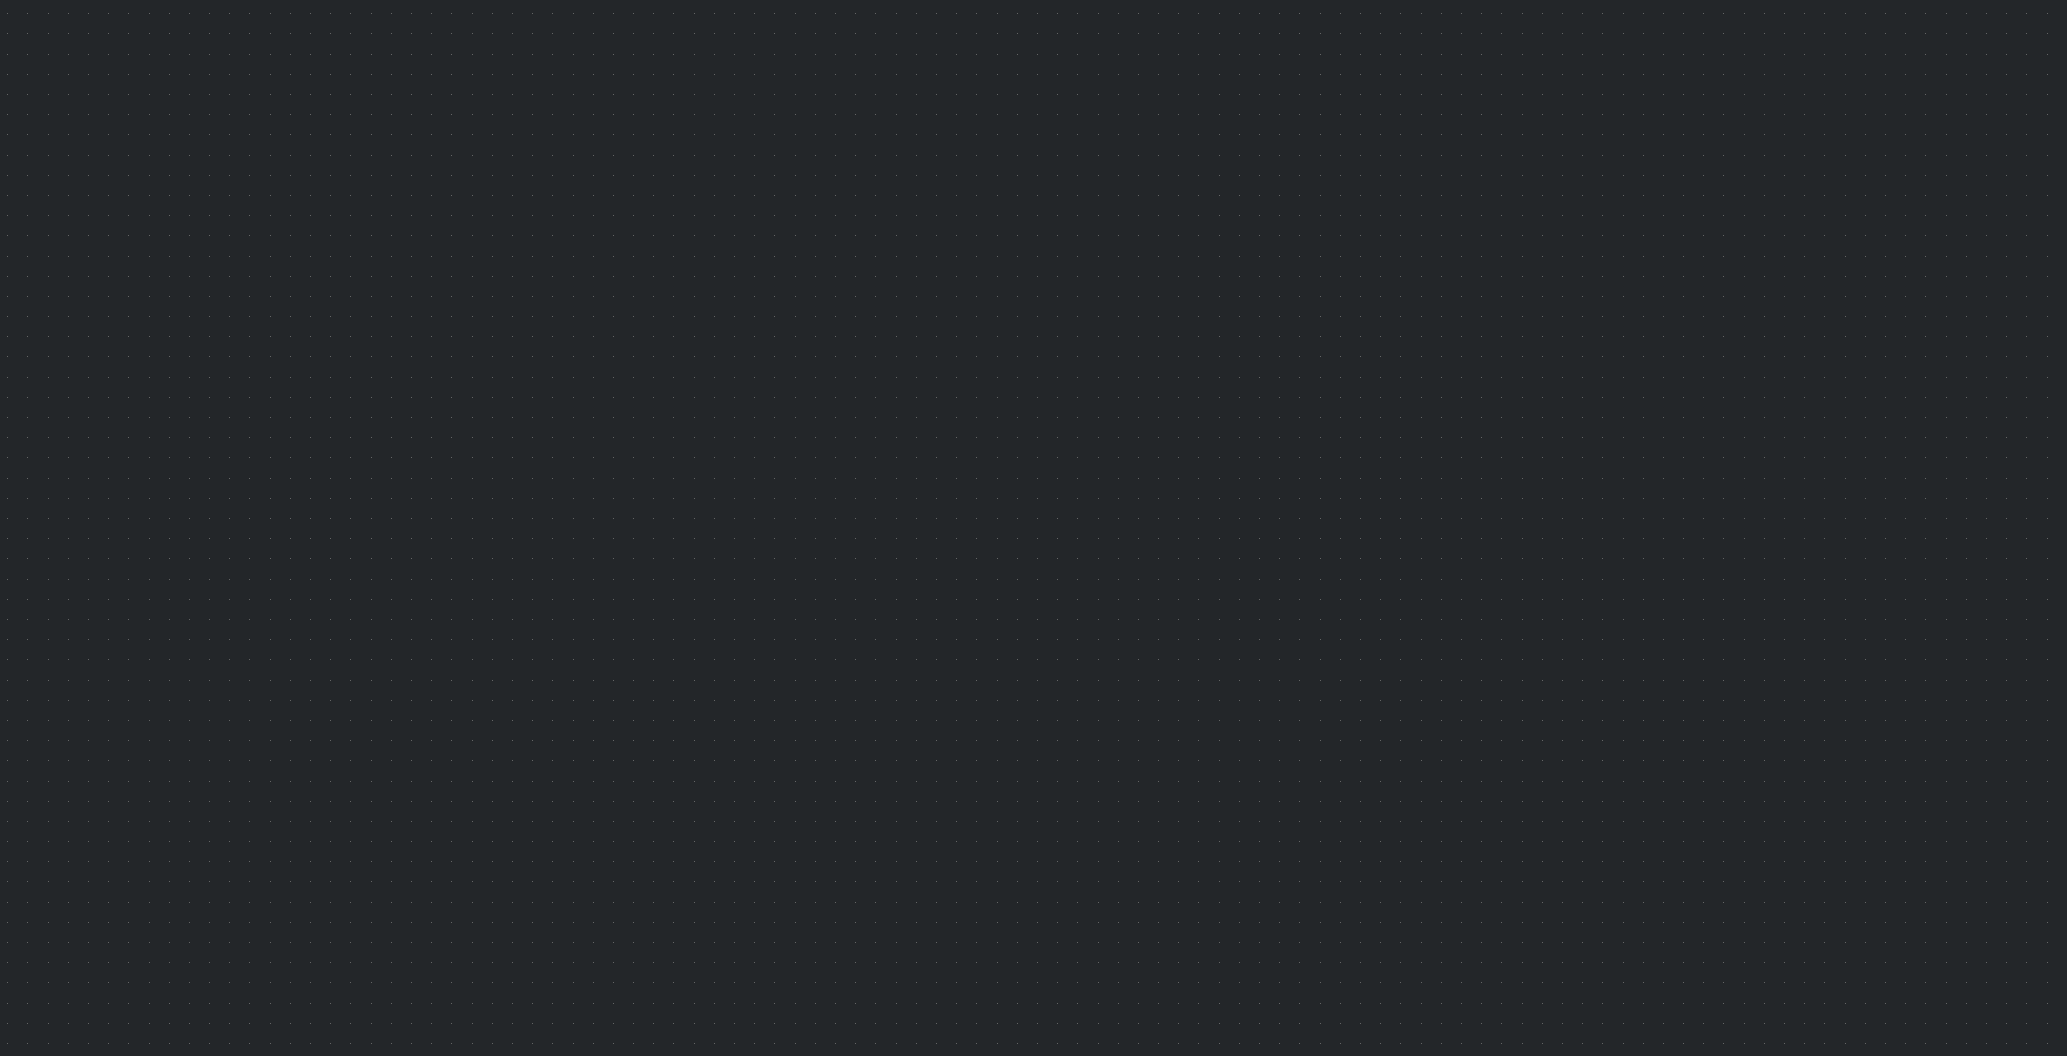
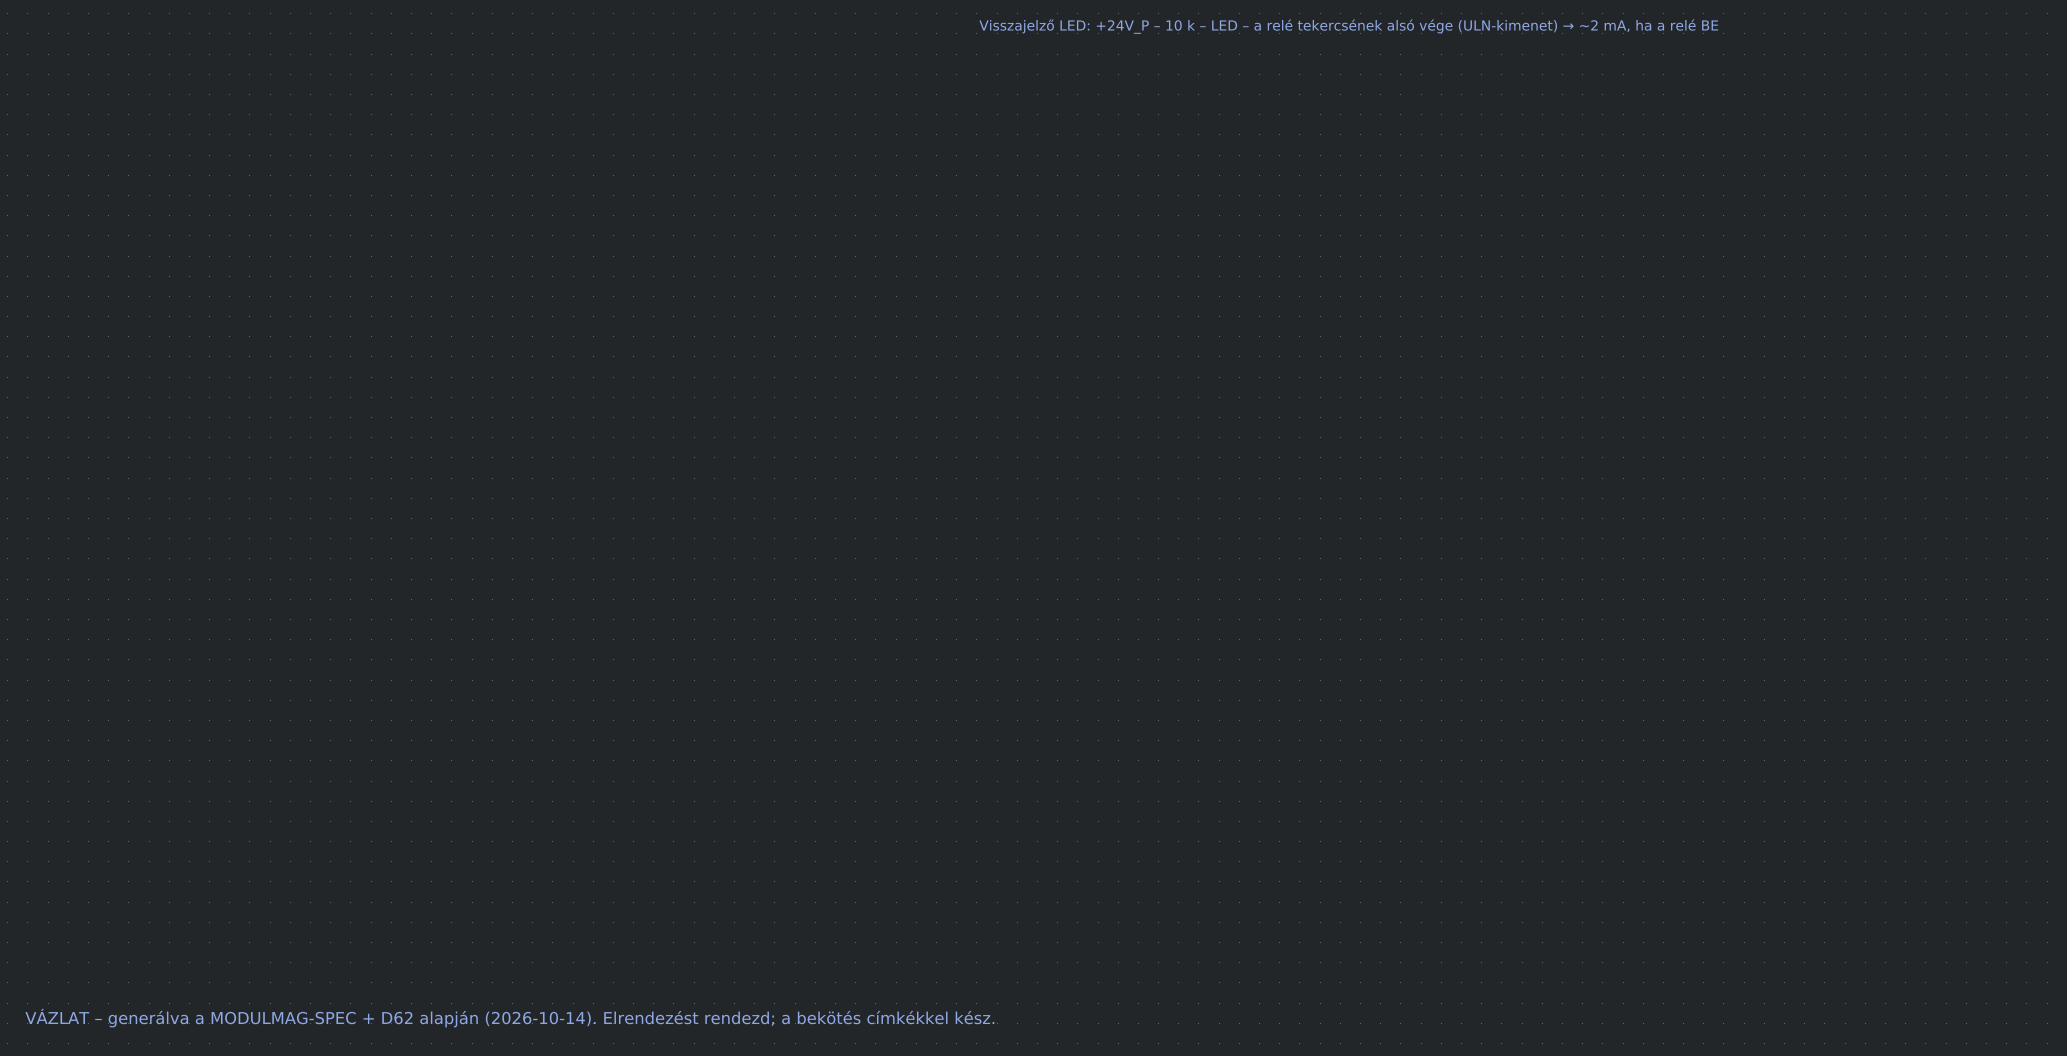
text: none -> Visszajelző LED: +24V_P – 10 k – LED – a relé tekercsének alsó vége (ULN-kimenet) → ~2 mA, ha a relé BE (1348, 26)
text: none -> VÁZLAT – generálva a MODULMAG-SPEC + D62 alapján (2026-10-14). Elrendezést rendezd; a bekötés címkékkel kész. (509, 1018)

